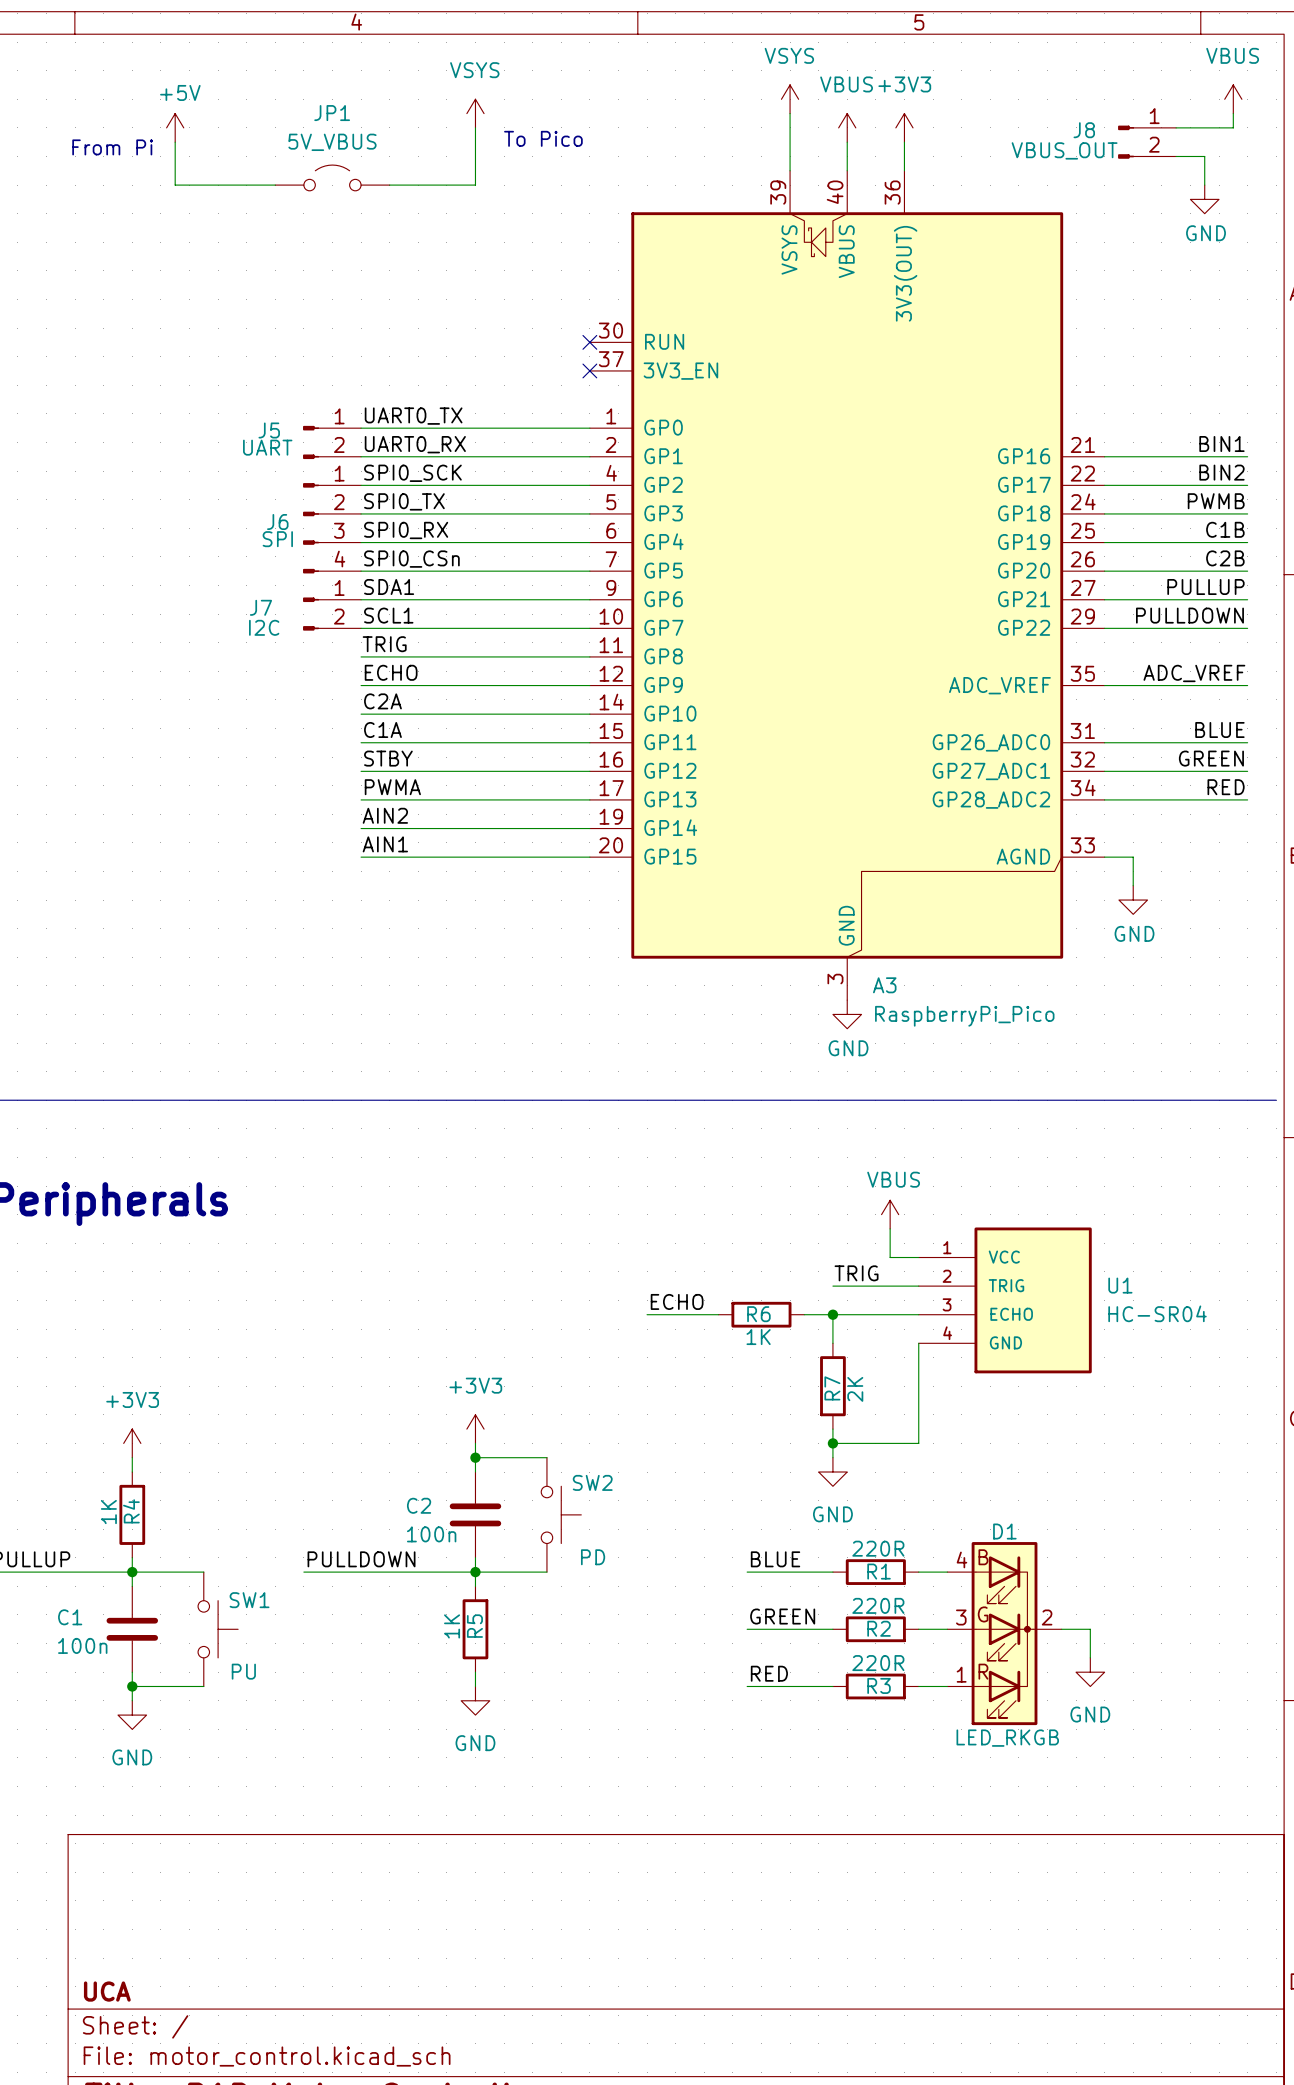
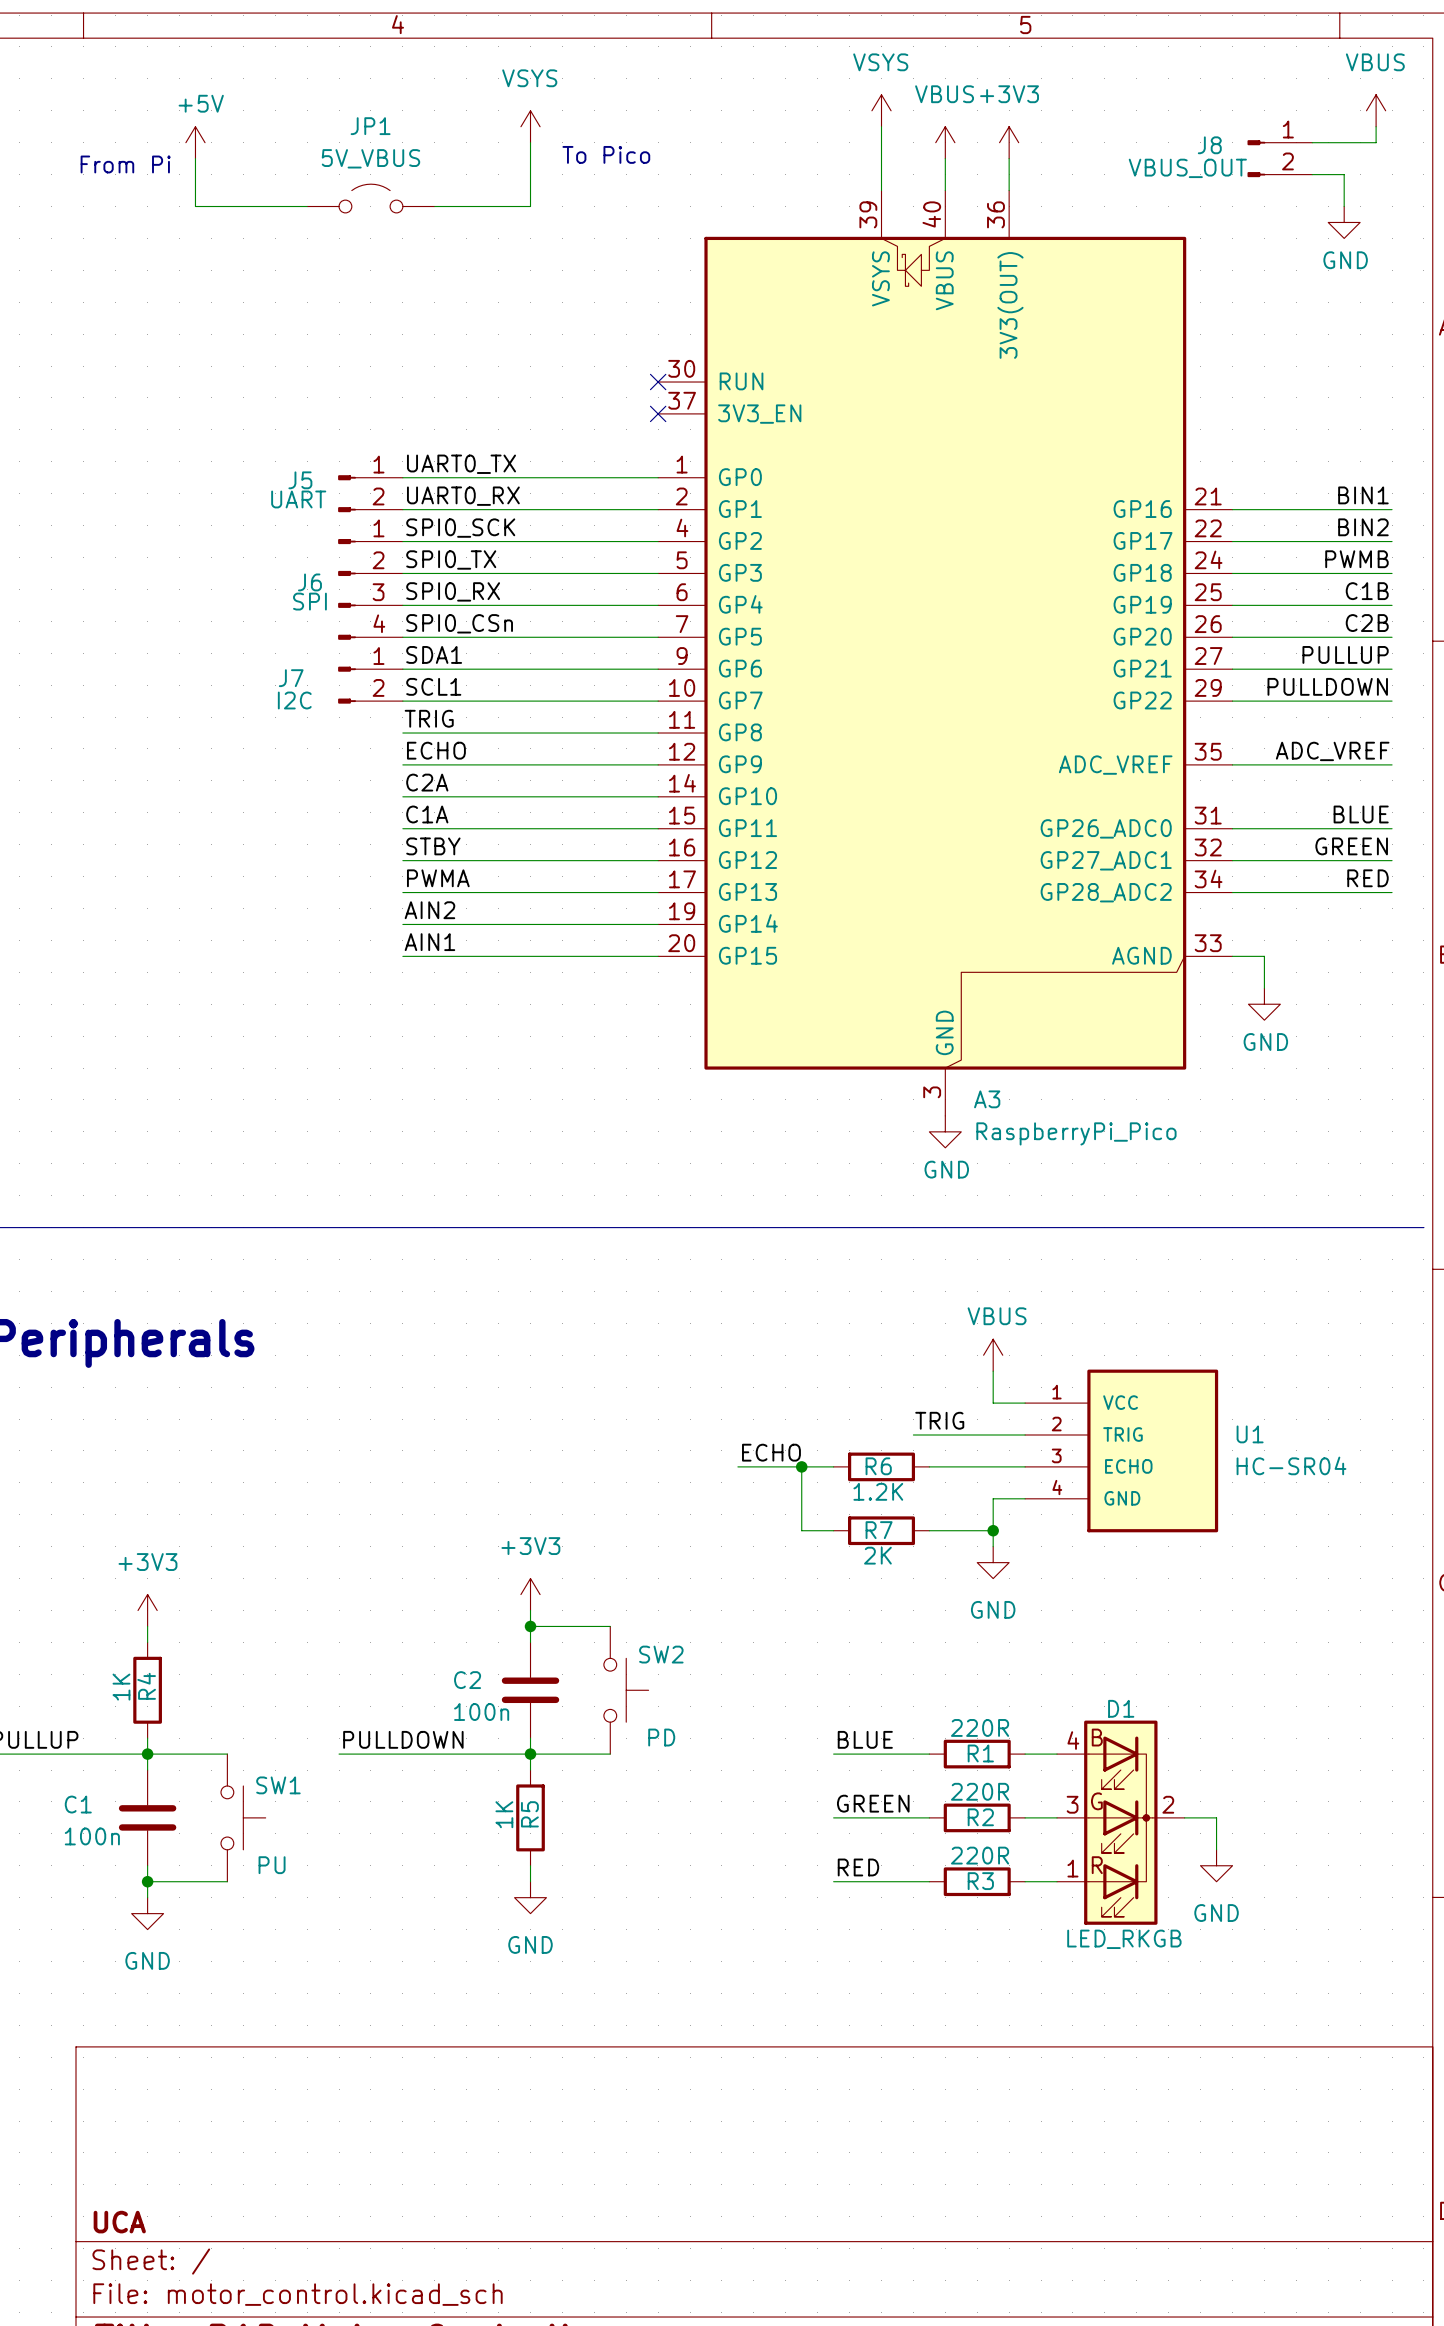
label position: TRIG (856, 1273) -> TRIG (939, 1420)
label position: ECHO (677, 1301) -> ECHO (771, 1452)
wire: (647, 1314) (661, 1314) -> (913, 1434) (929, 1434)
junction: none -> (801, 1466)
wire: none -> (833, 1466) (801, 1466) (801, 1530) (833, 1530)
R6 position: (761, 1314) -> (881, 1466)
wire: (804, 1314) (832, 1314) (832, 1343) -> none
junction: (832, 1314) -> none
R6 value: 1K (758, 1337) -> 1.2K (878, 1491)
wire: (918, 1343) (918, 1443) (832, 1443) -> (1025, 1498) (993, 1498) (993, 1546)
wire: none -> (929, 1530) (993, 1530)
junction: none -> (993, 1530)
R7 rotation: 0° (832, 1386) -> 90° clockwise (881, 1530)
wire: (832, 1429) (832, 1457) -> none
junction: (832, 1443) -> none
power symbol position: GND (832, 1472) -> GND (993, 1562)

